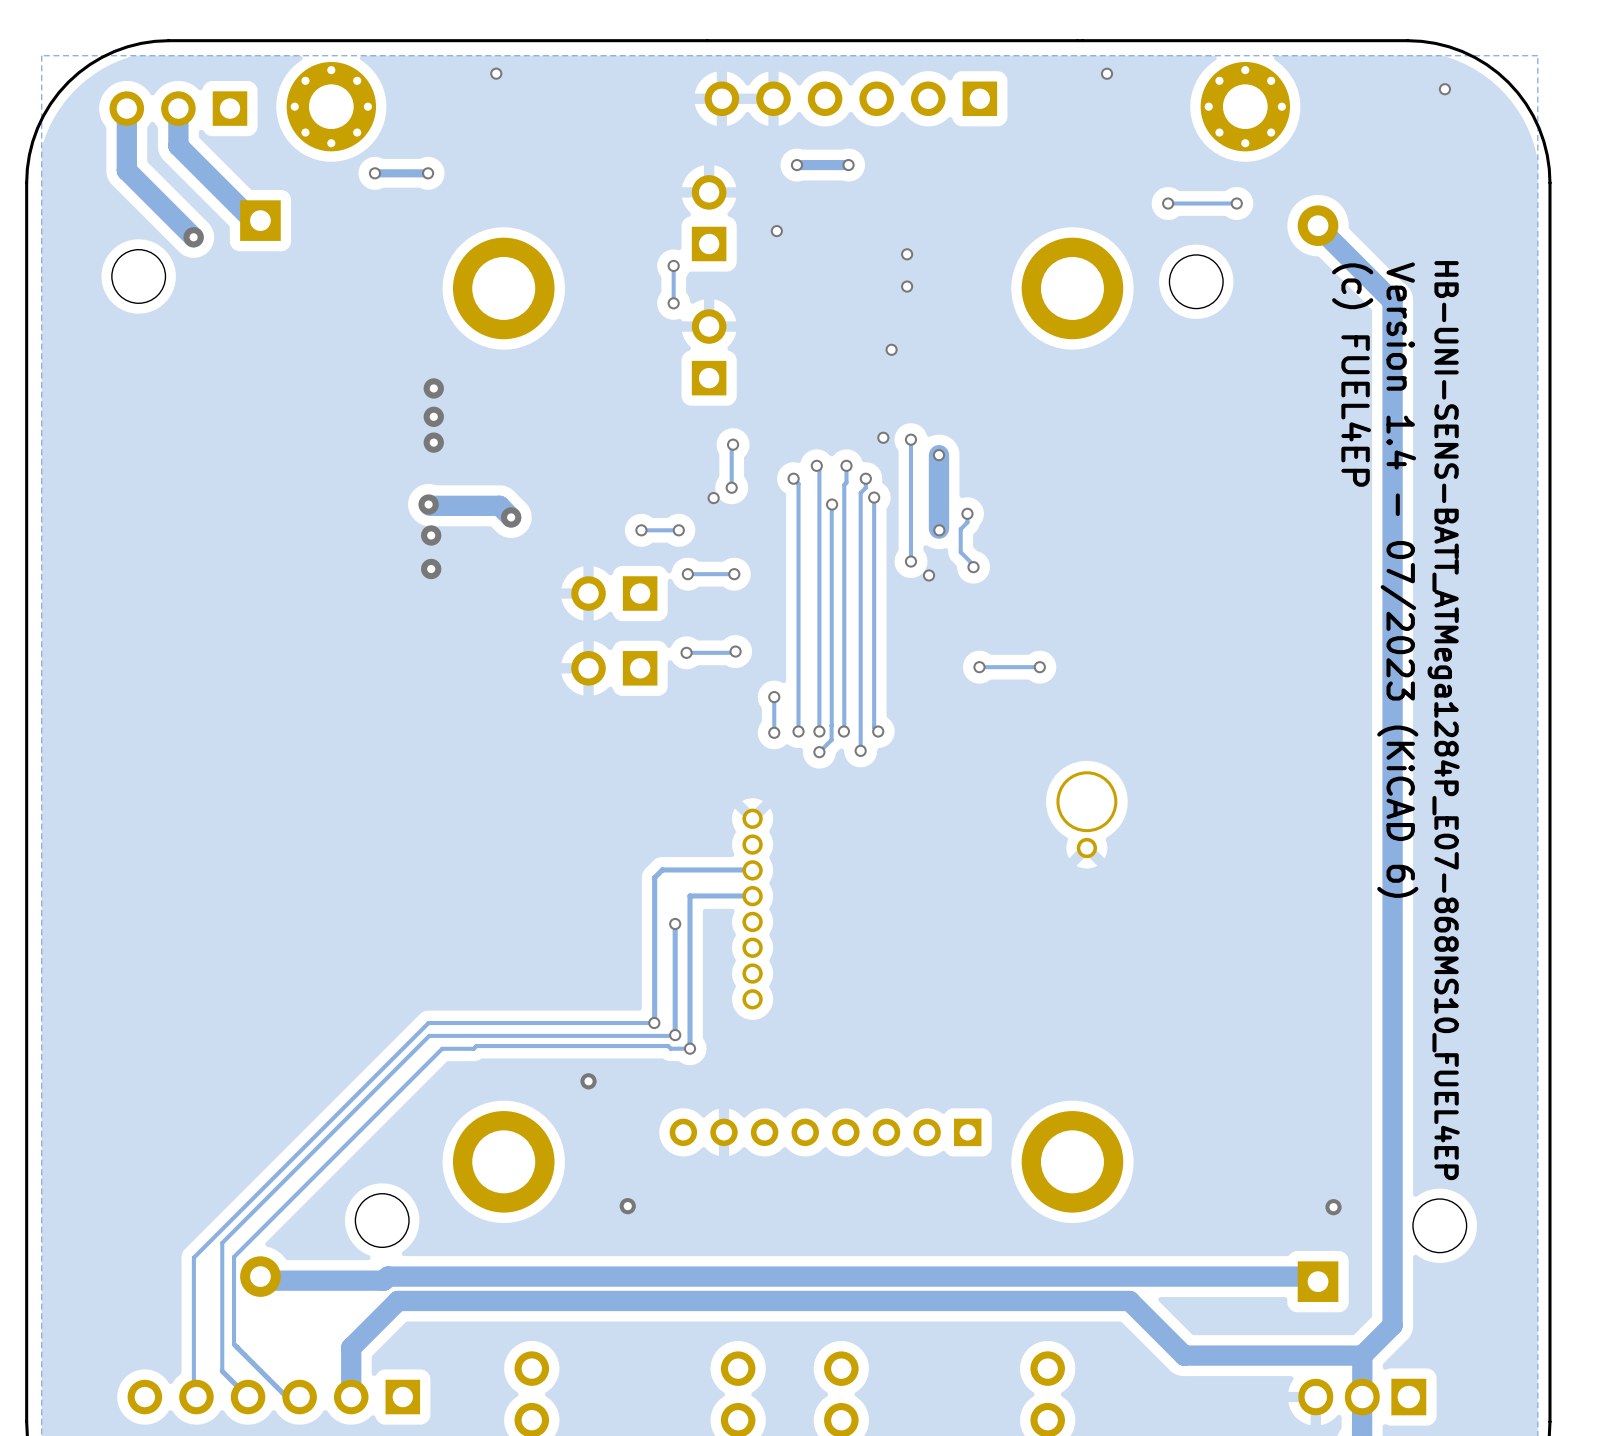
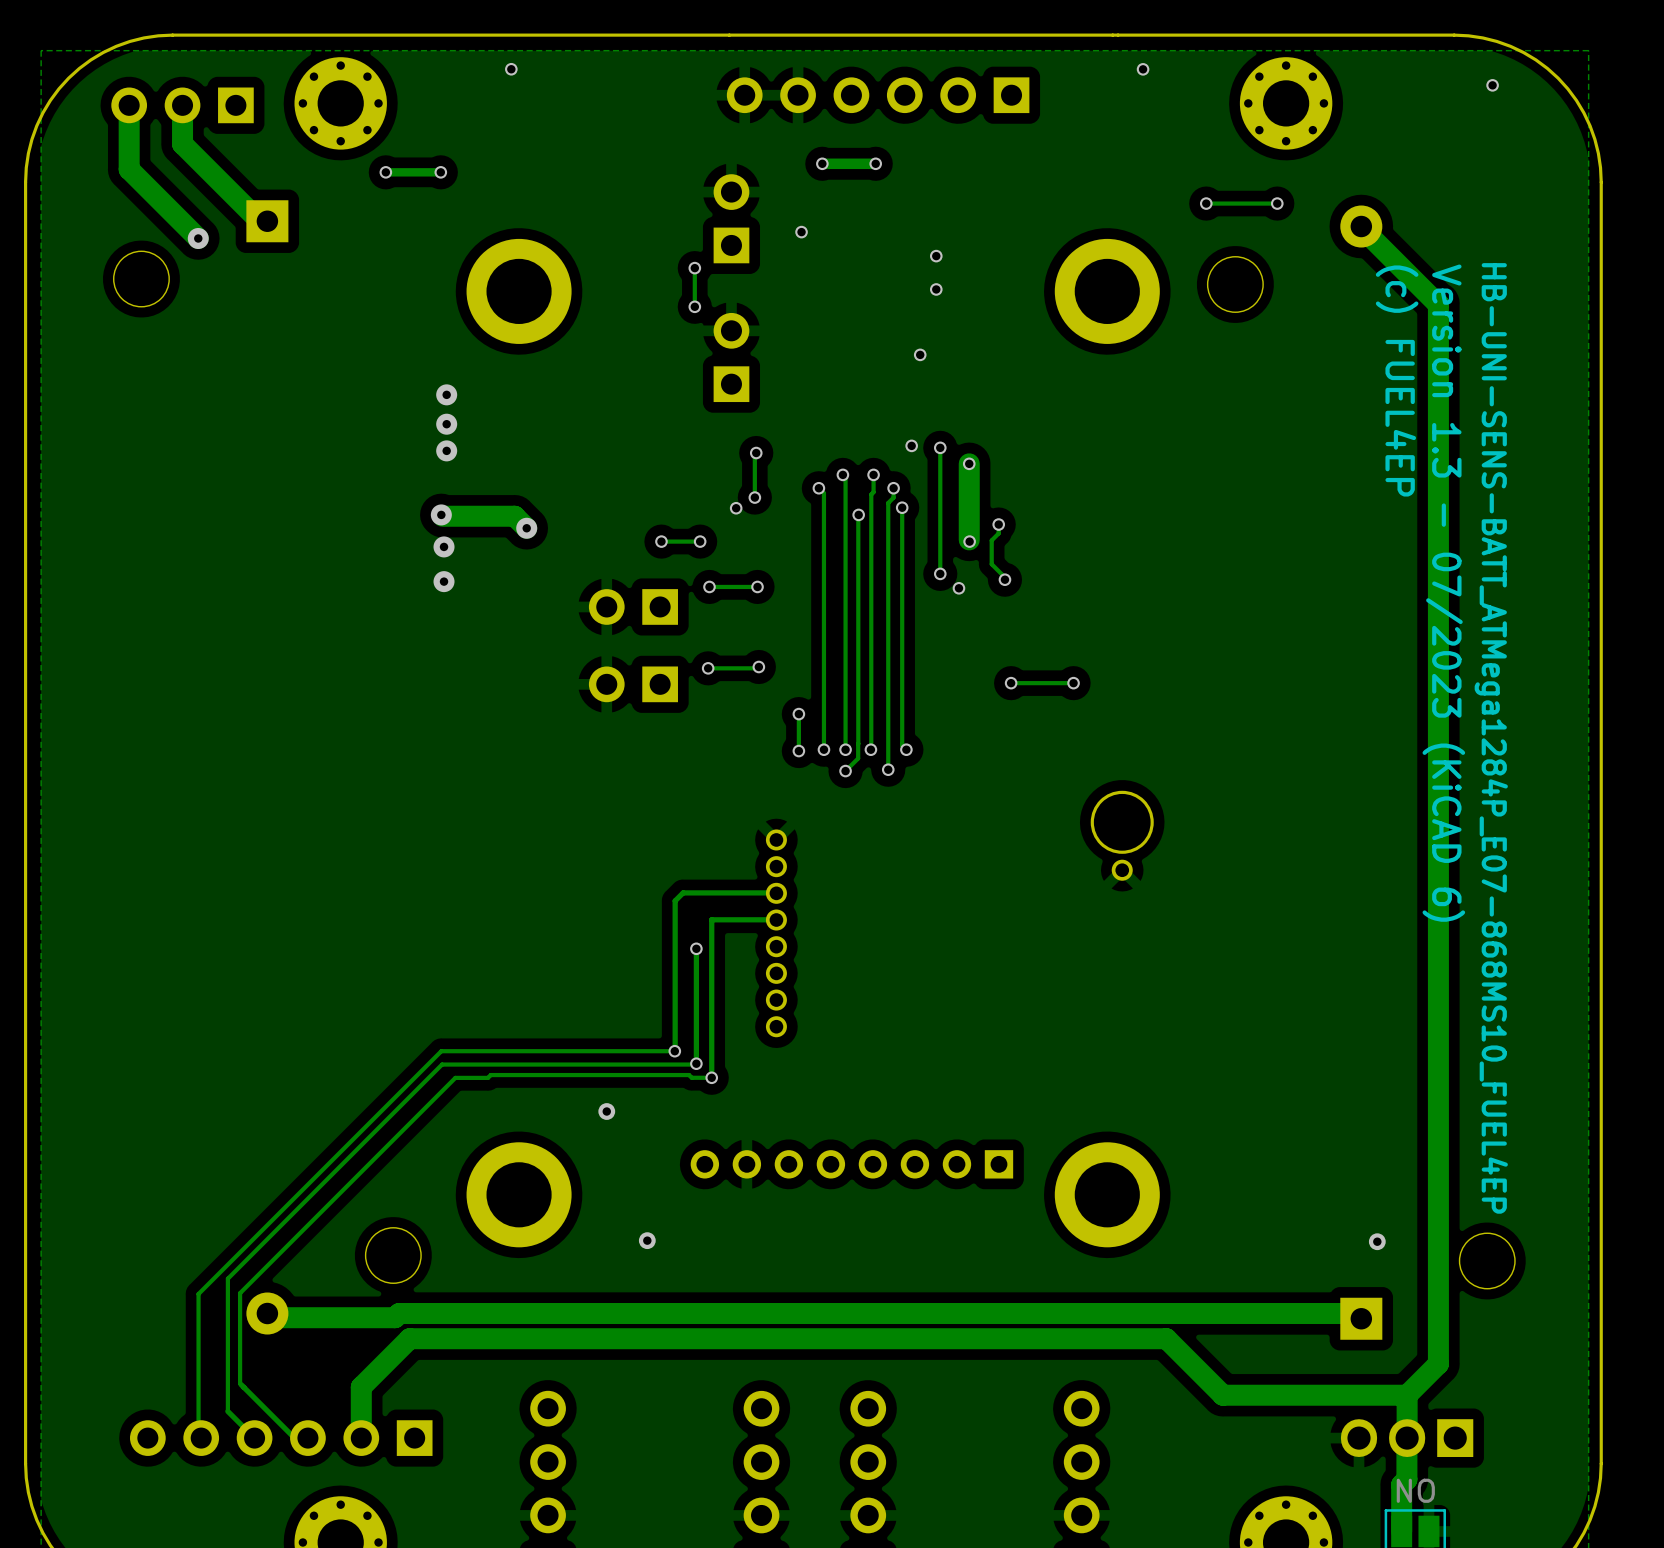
text: Version 1.4 - 07/2023 (KiCAD 6) (1397, 580) -> Version 1.3 - 07/2023 (KiCAD 6) (1443, 593)

